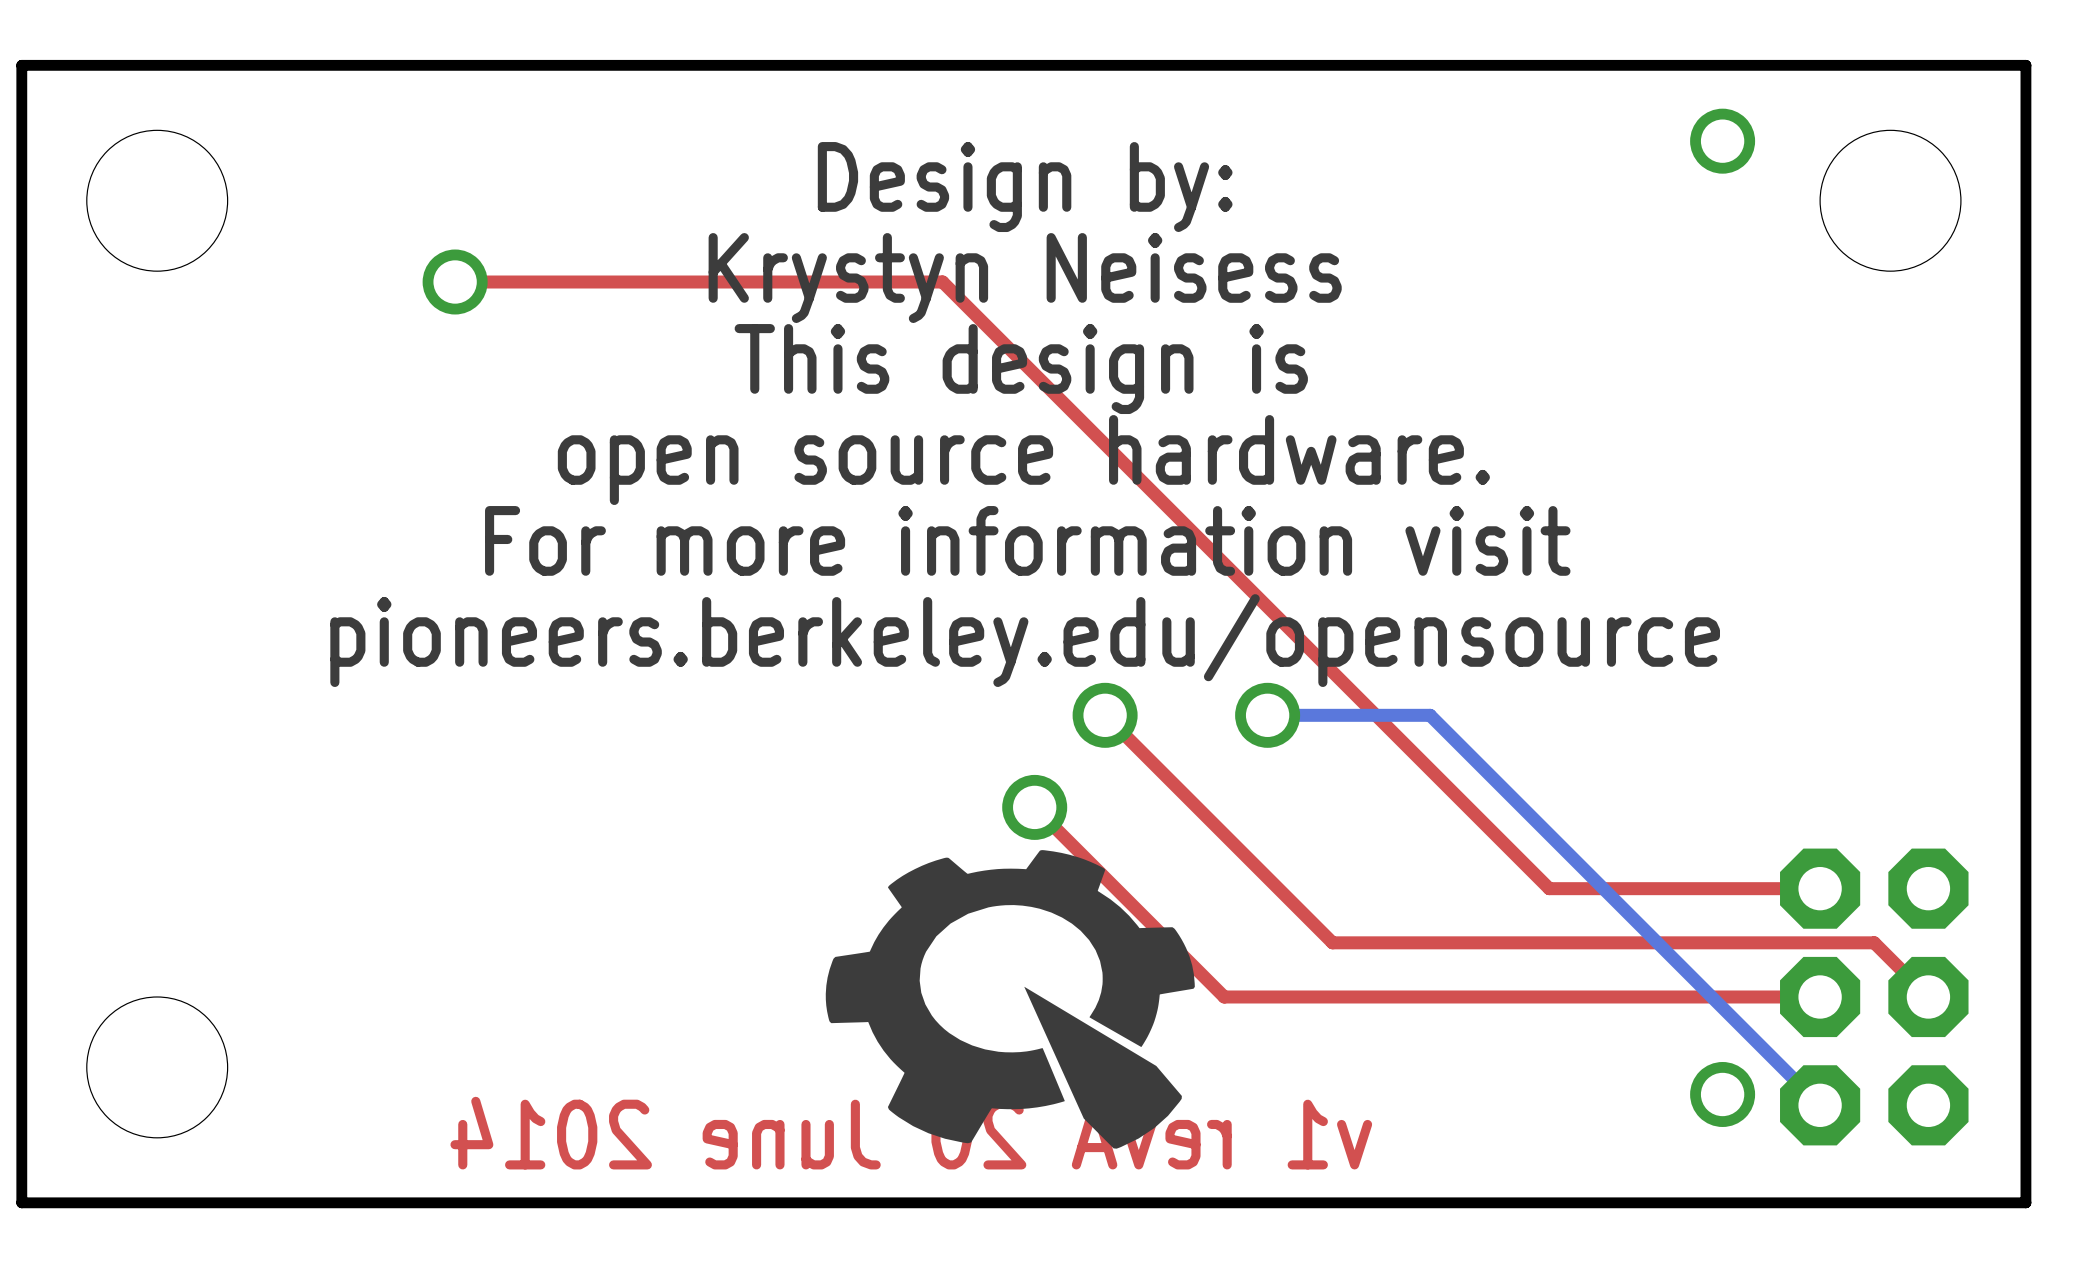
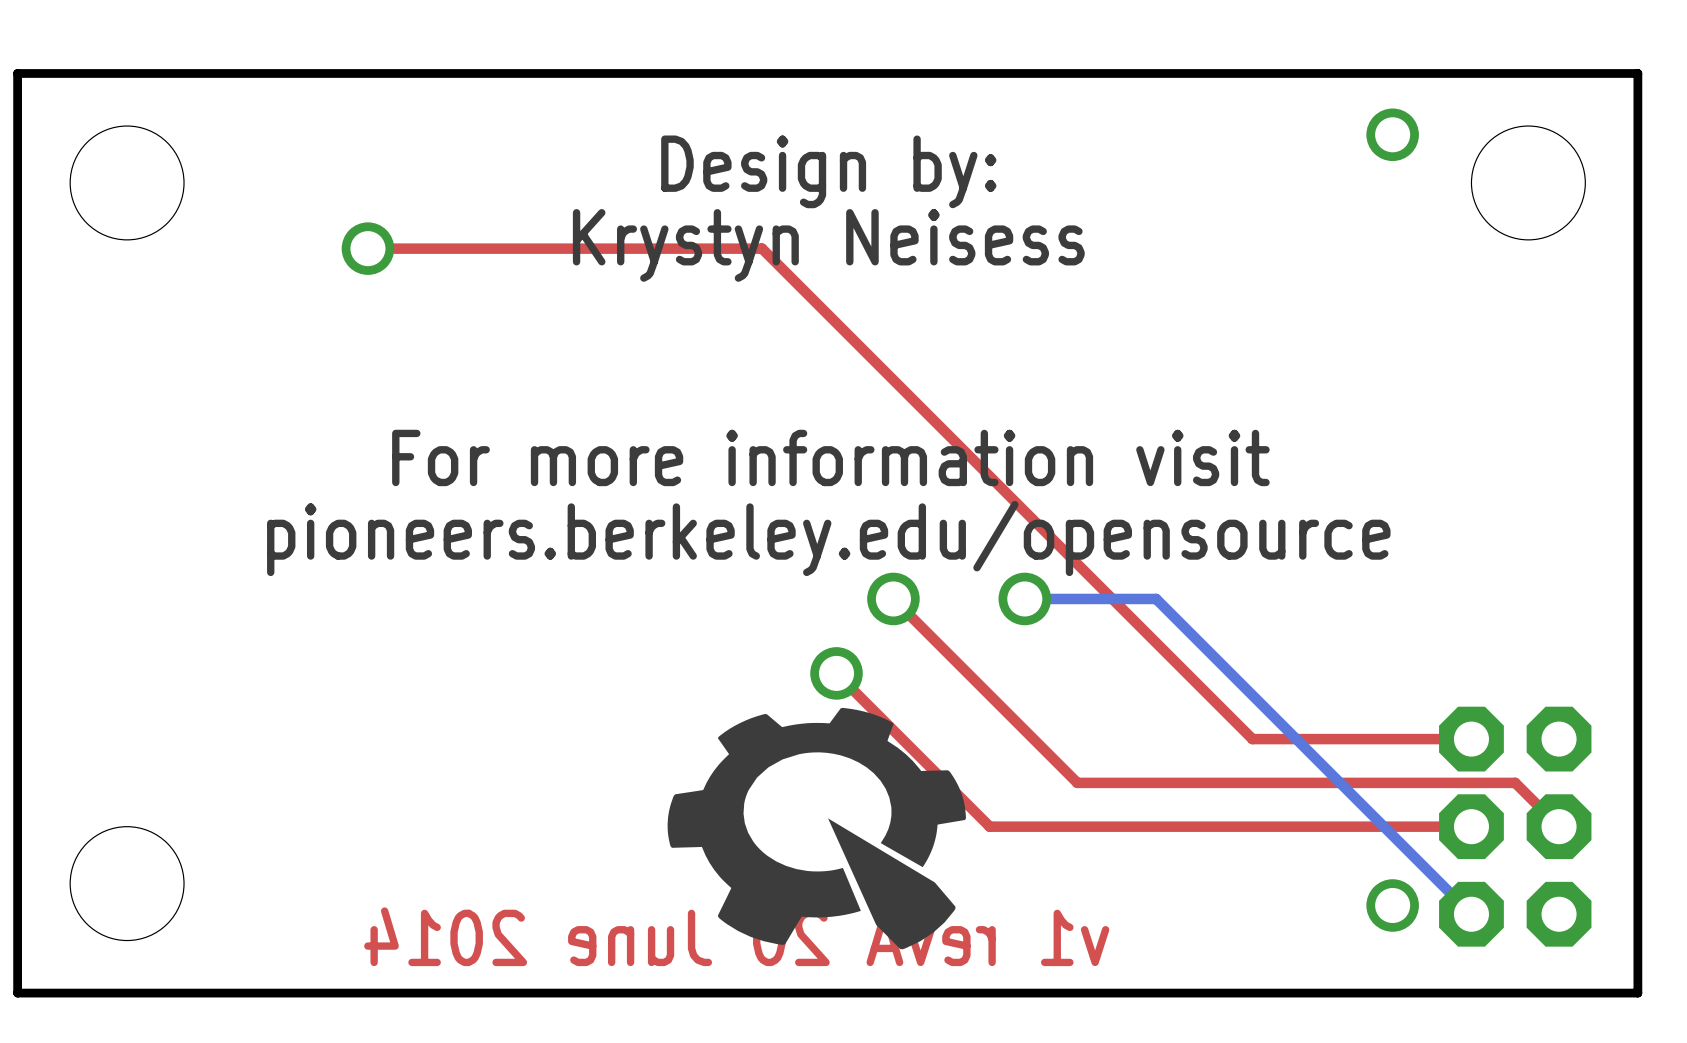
text: This design is (1021, 369) -> none
text: open source hardware. (1023, 460) -> none

